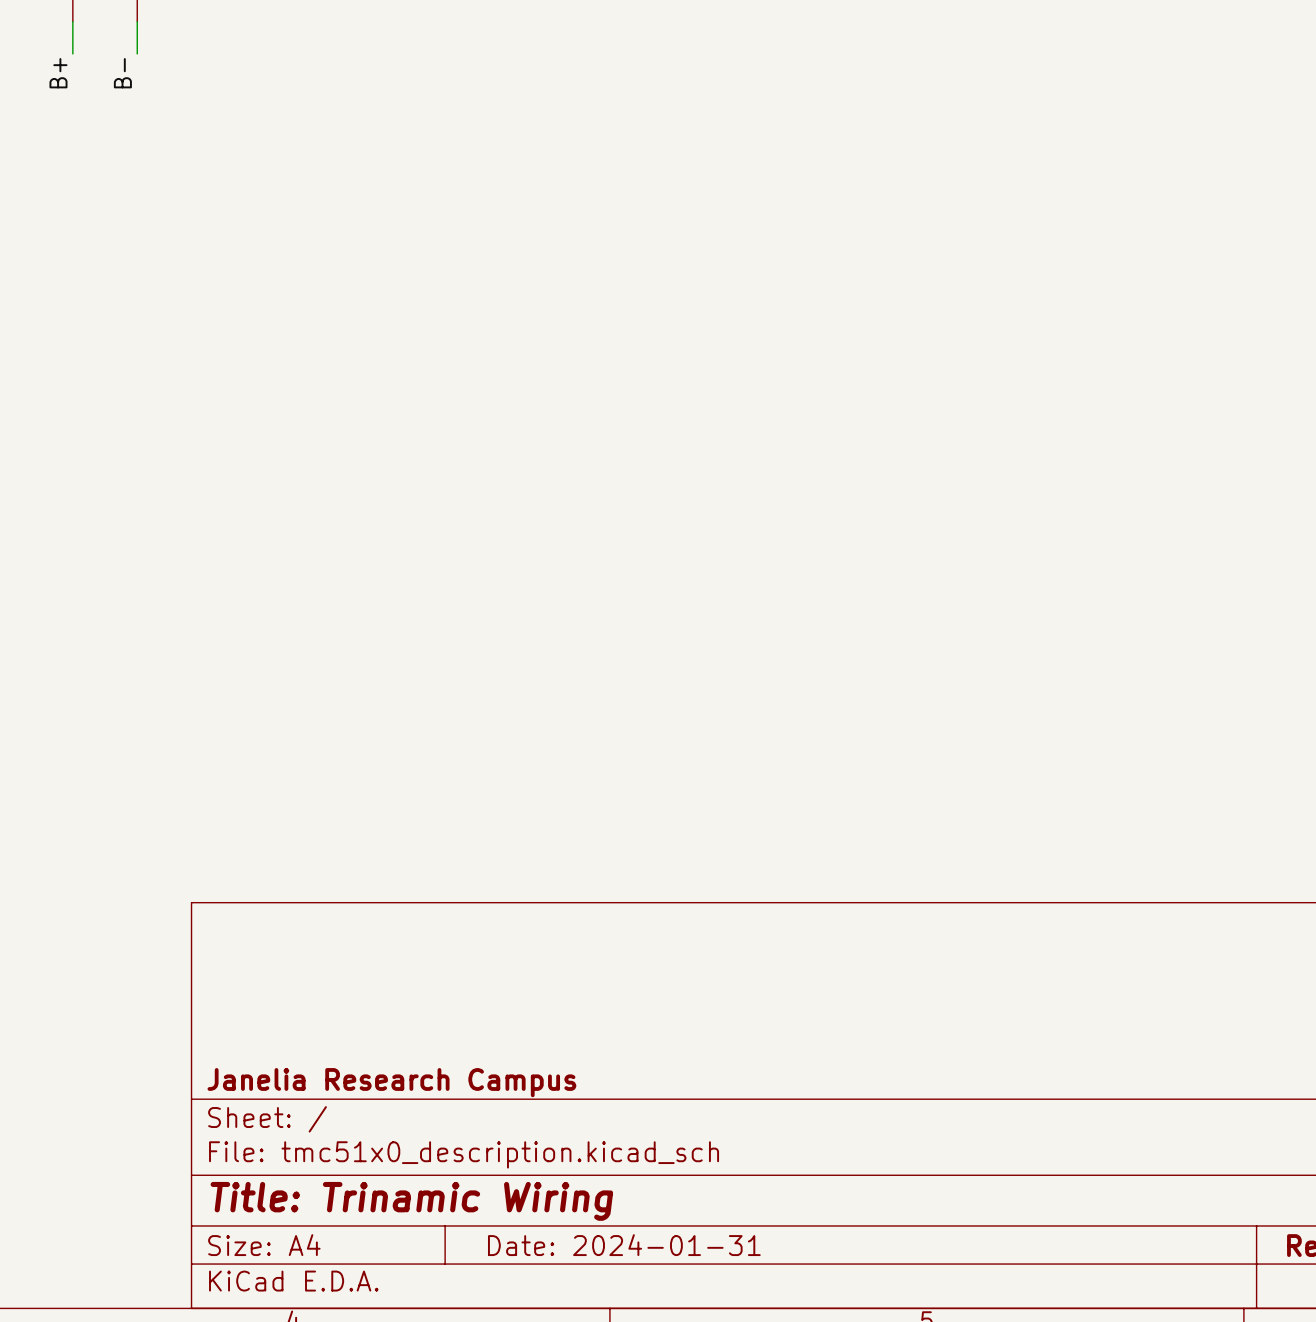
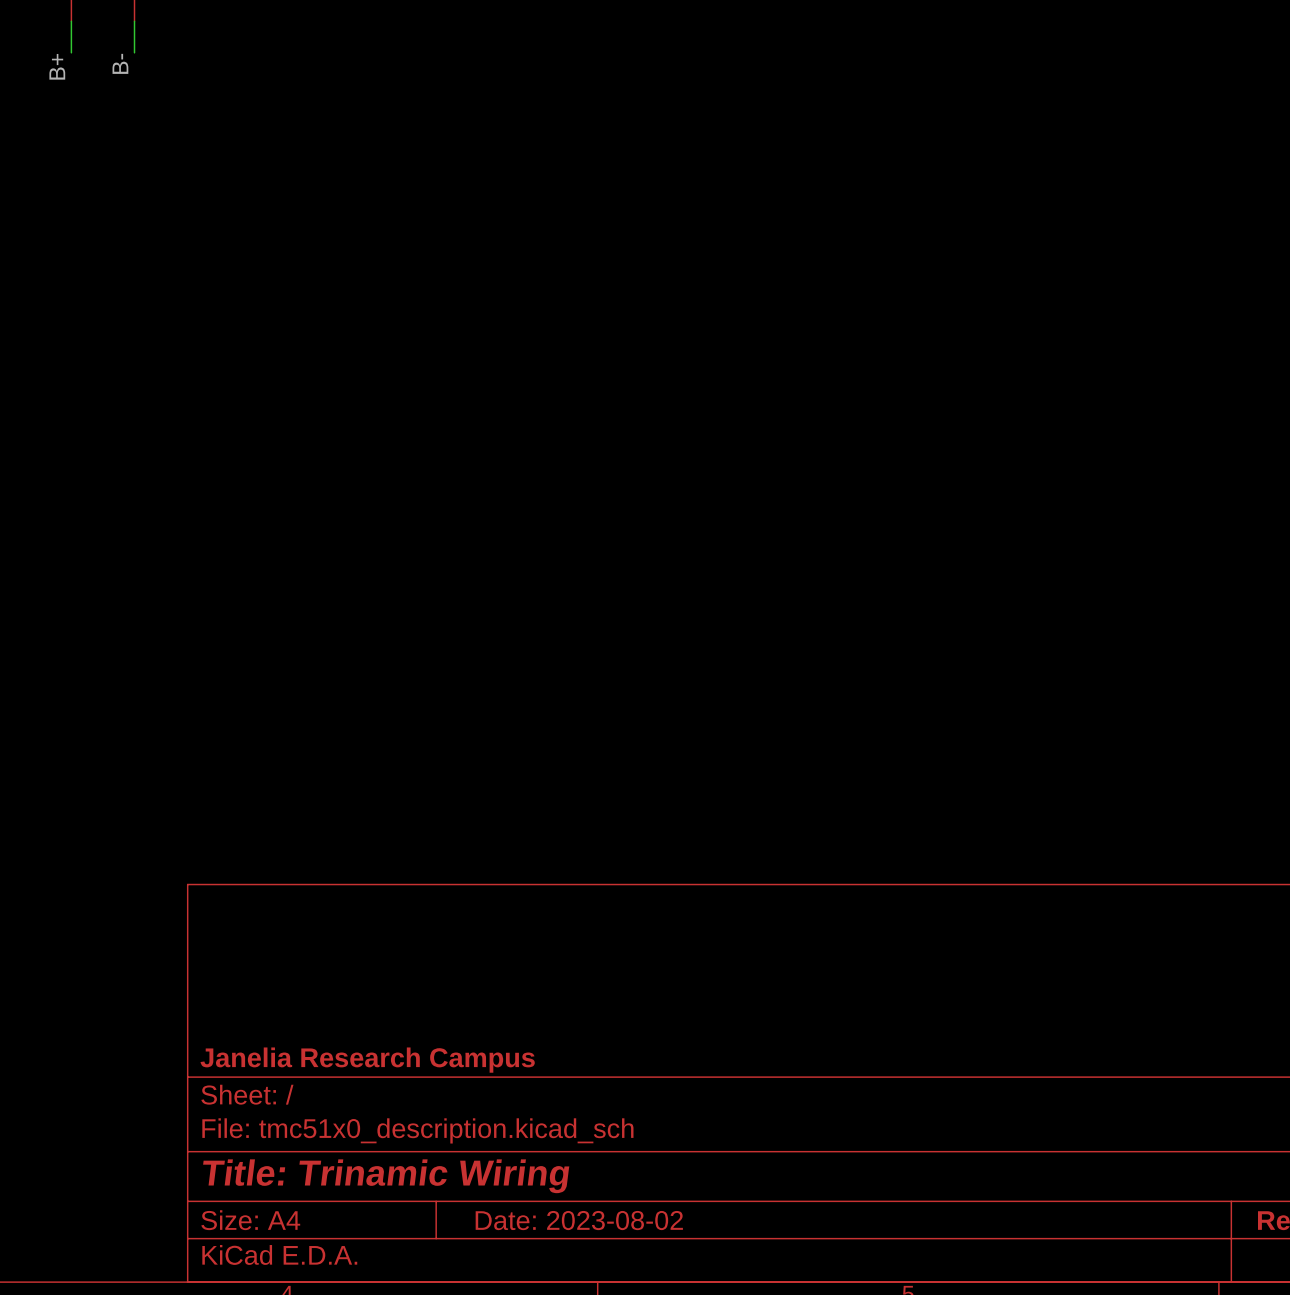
title block: Date: 2024-01-31 (624, 1245) -> Date: 2023-08-02 (579, 1220)

